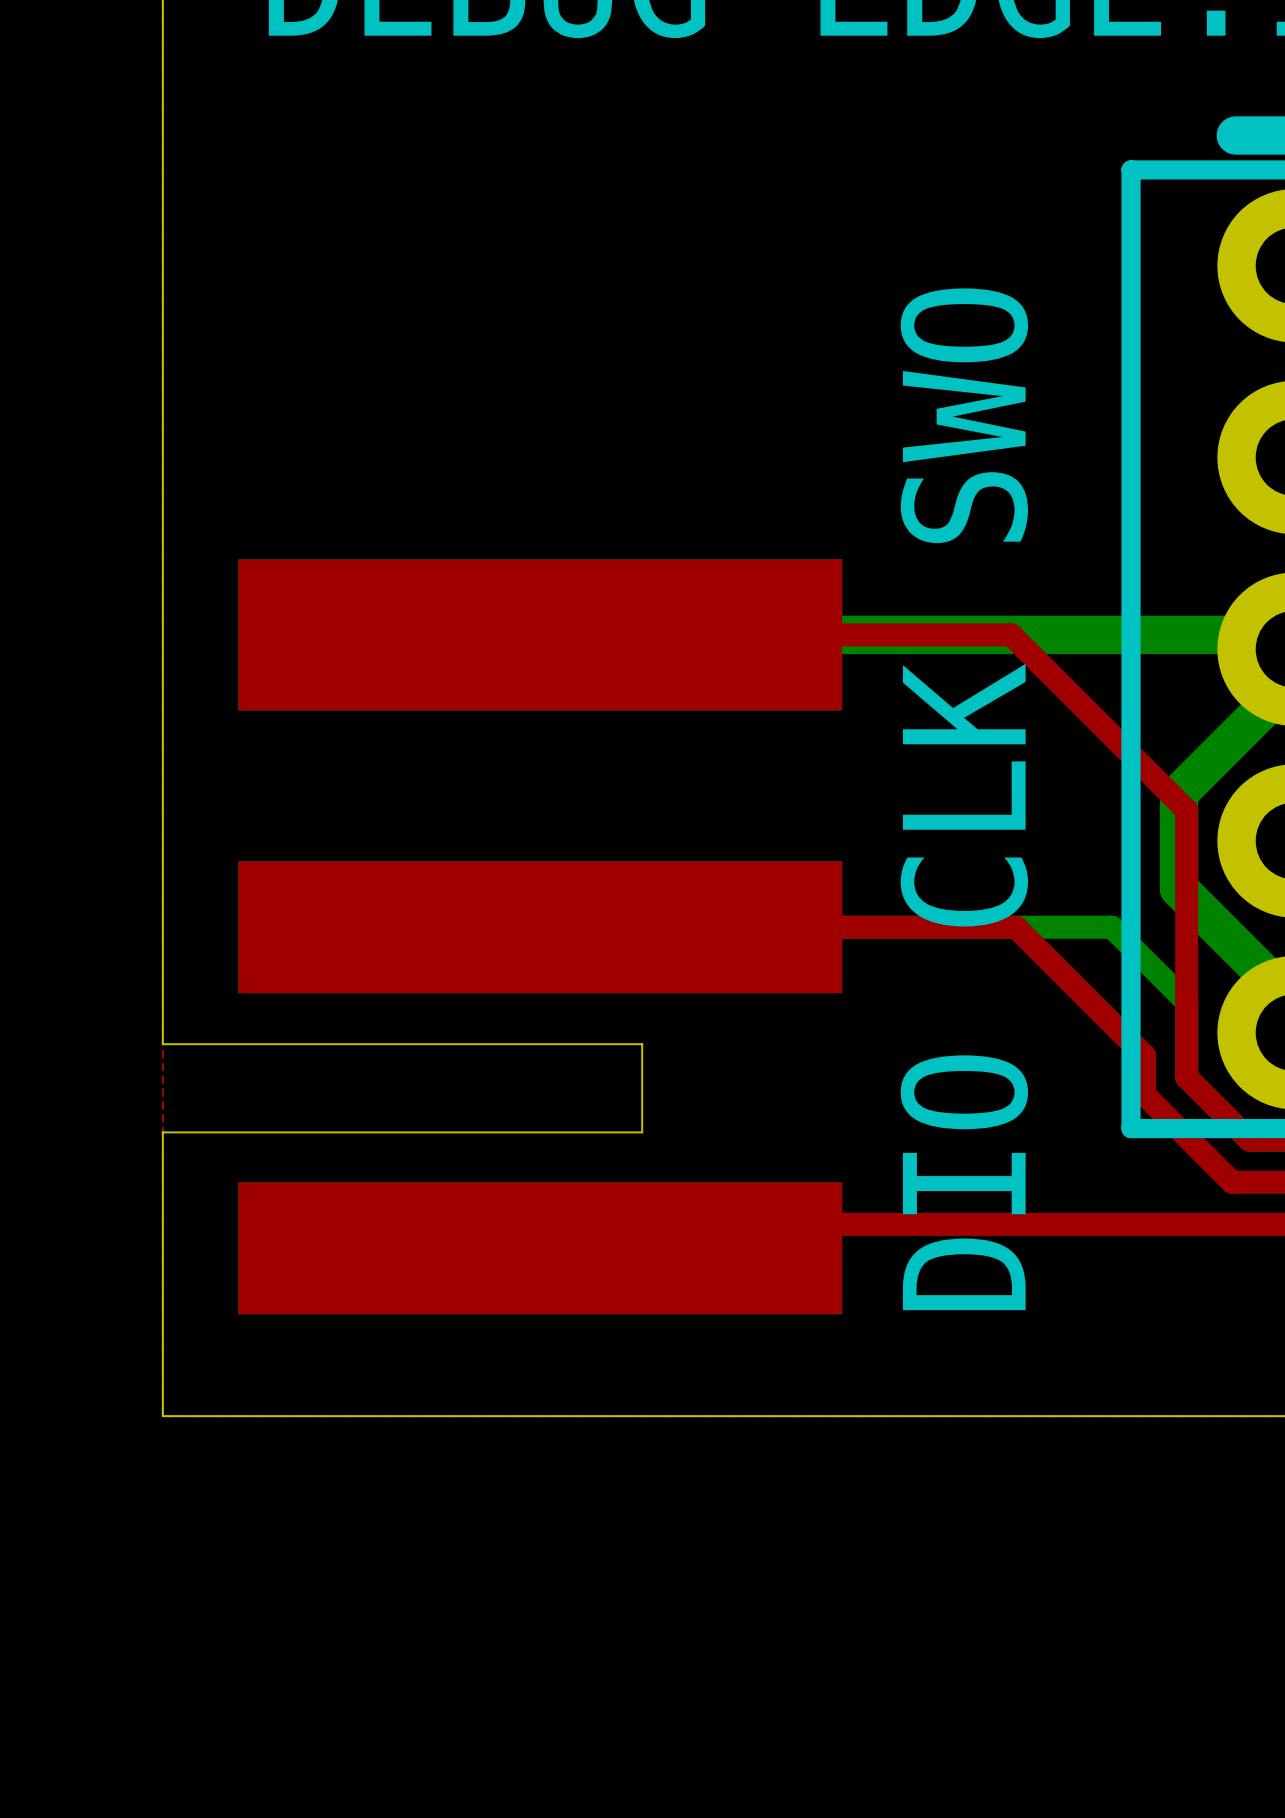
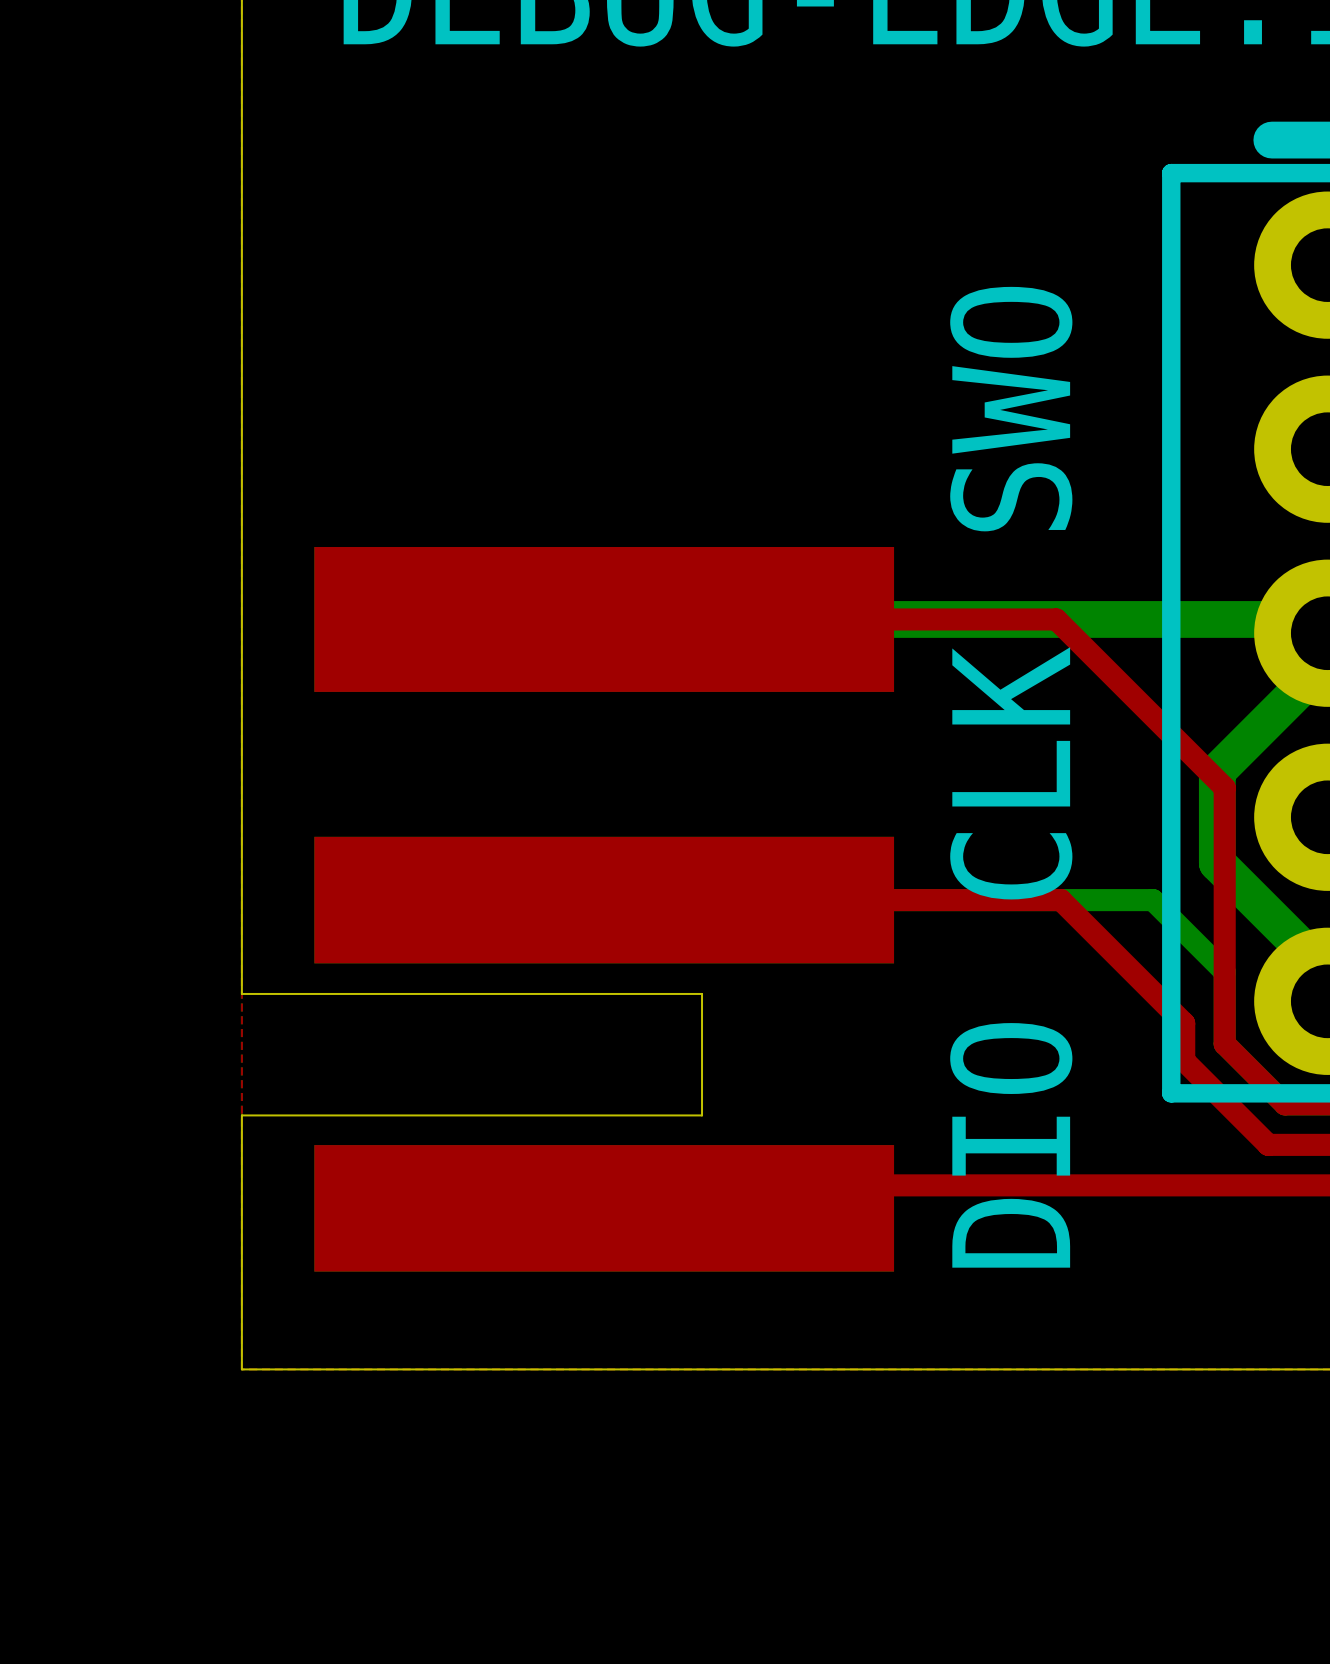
board edge: (162, 1025) (162, 1044) (642, 1044) -> (241, 993) (702, 993) (702, 1012)
board edge: (642, 1132) (162, 1132) (162, 1151) -> (702, 1097) (702, 1115) (241, 1115)

